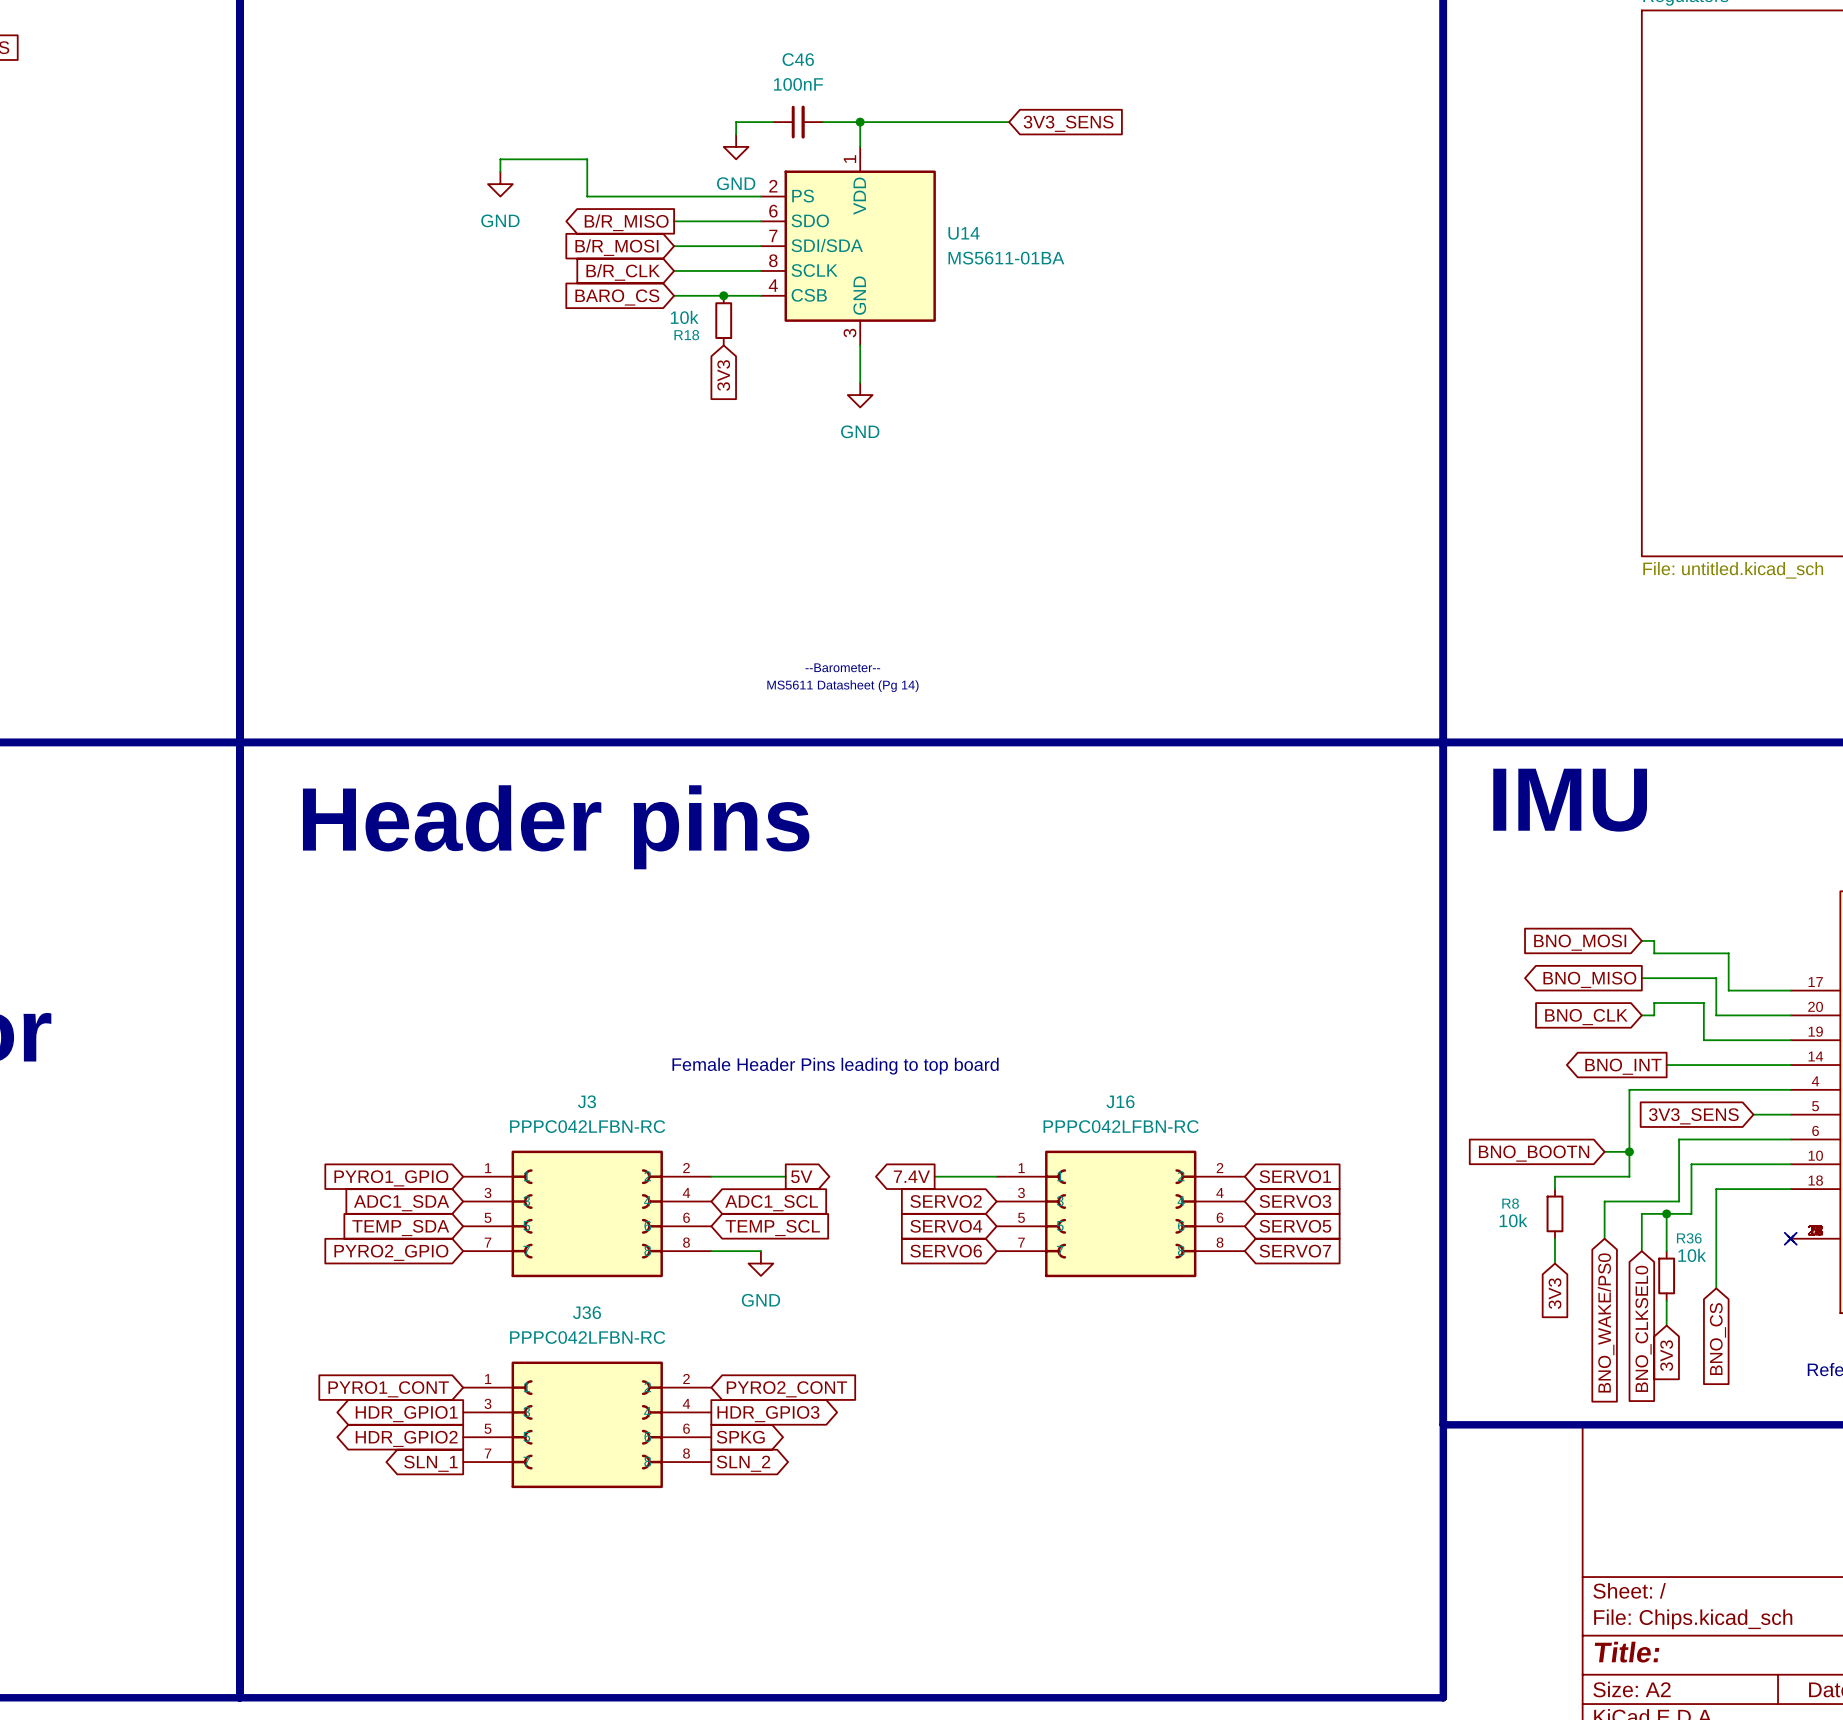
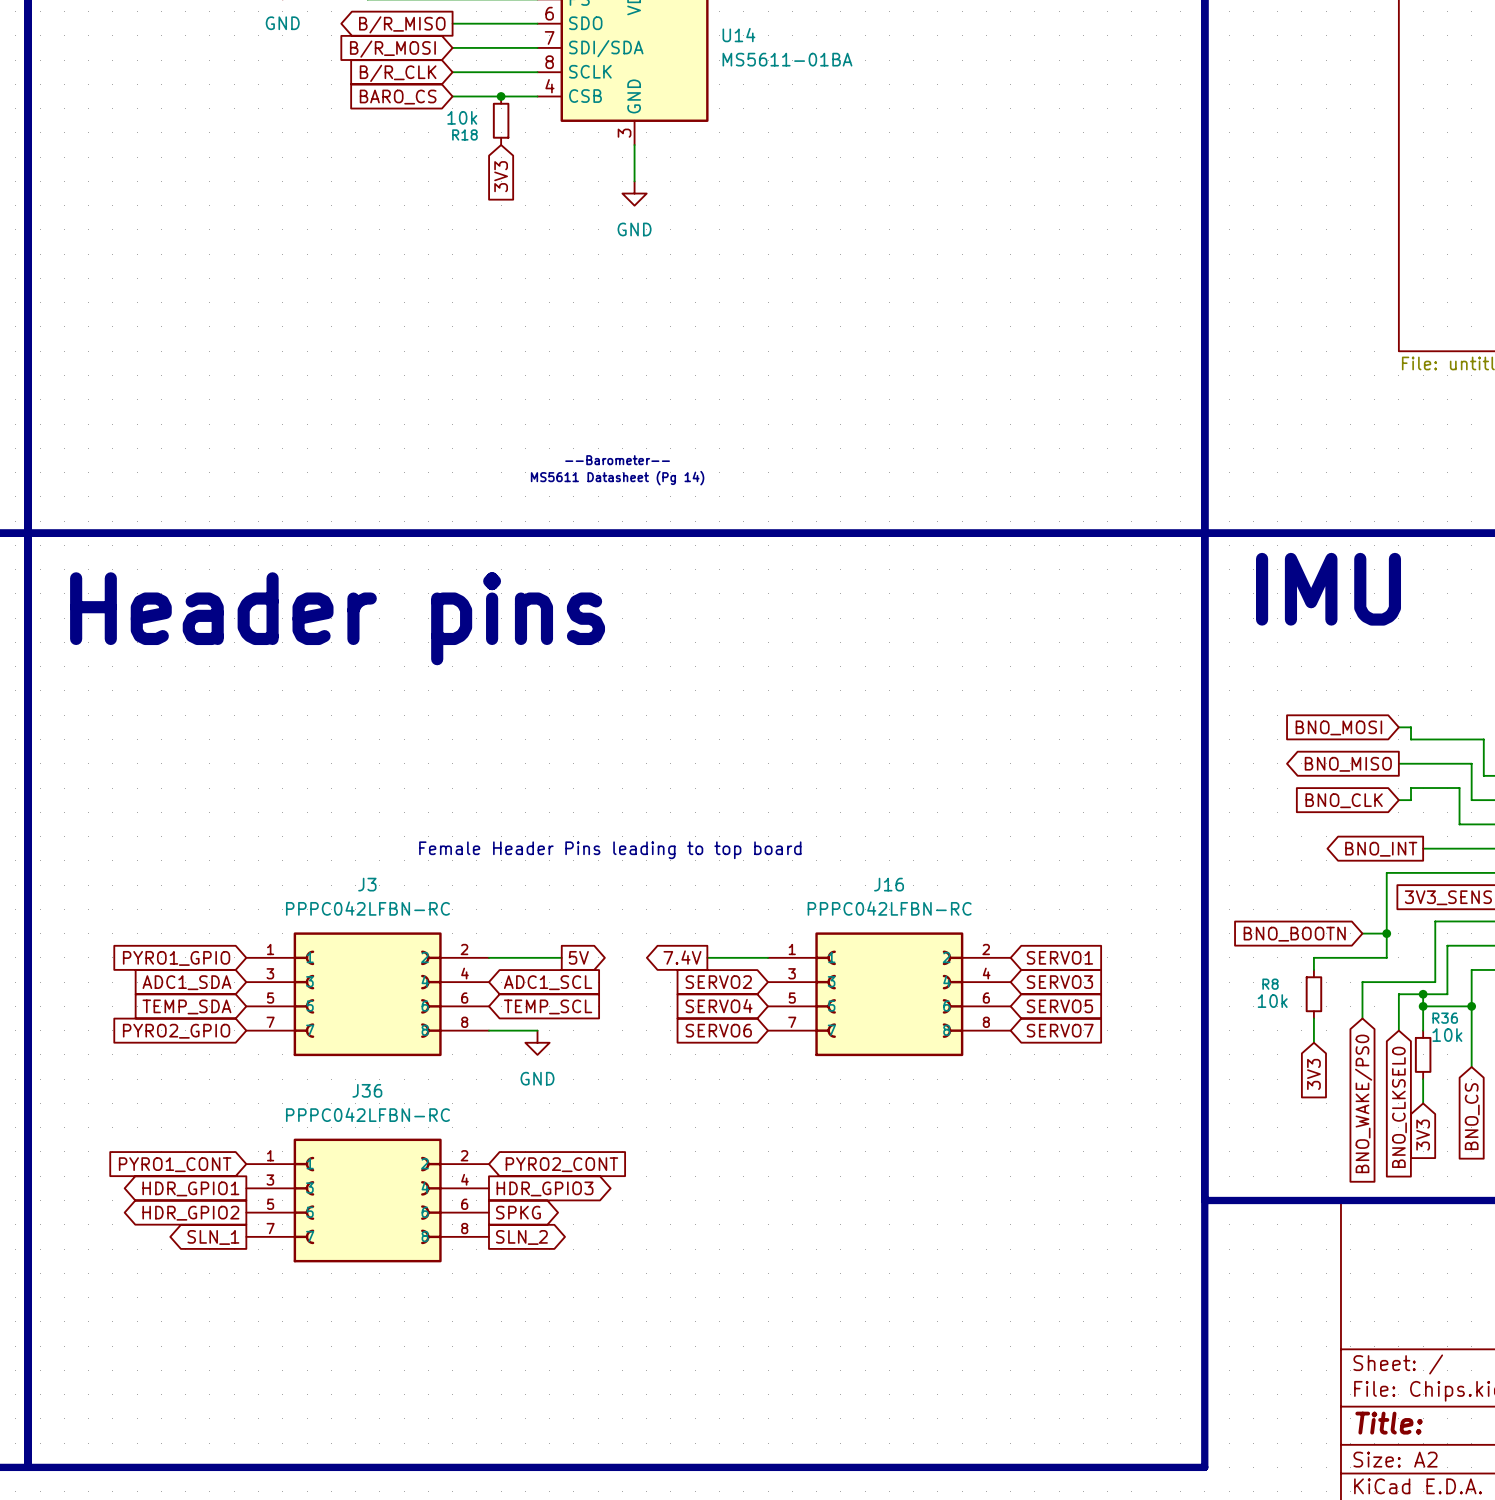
wire: none -> (1423, 1006) (1471, 1006)
junction: none -> (1423, 1006)
junction: none -> (1471, 1006)

